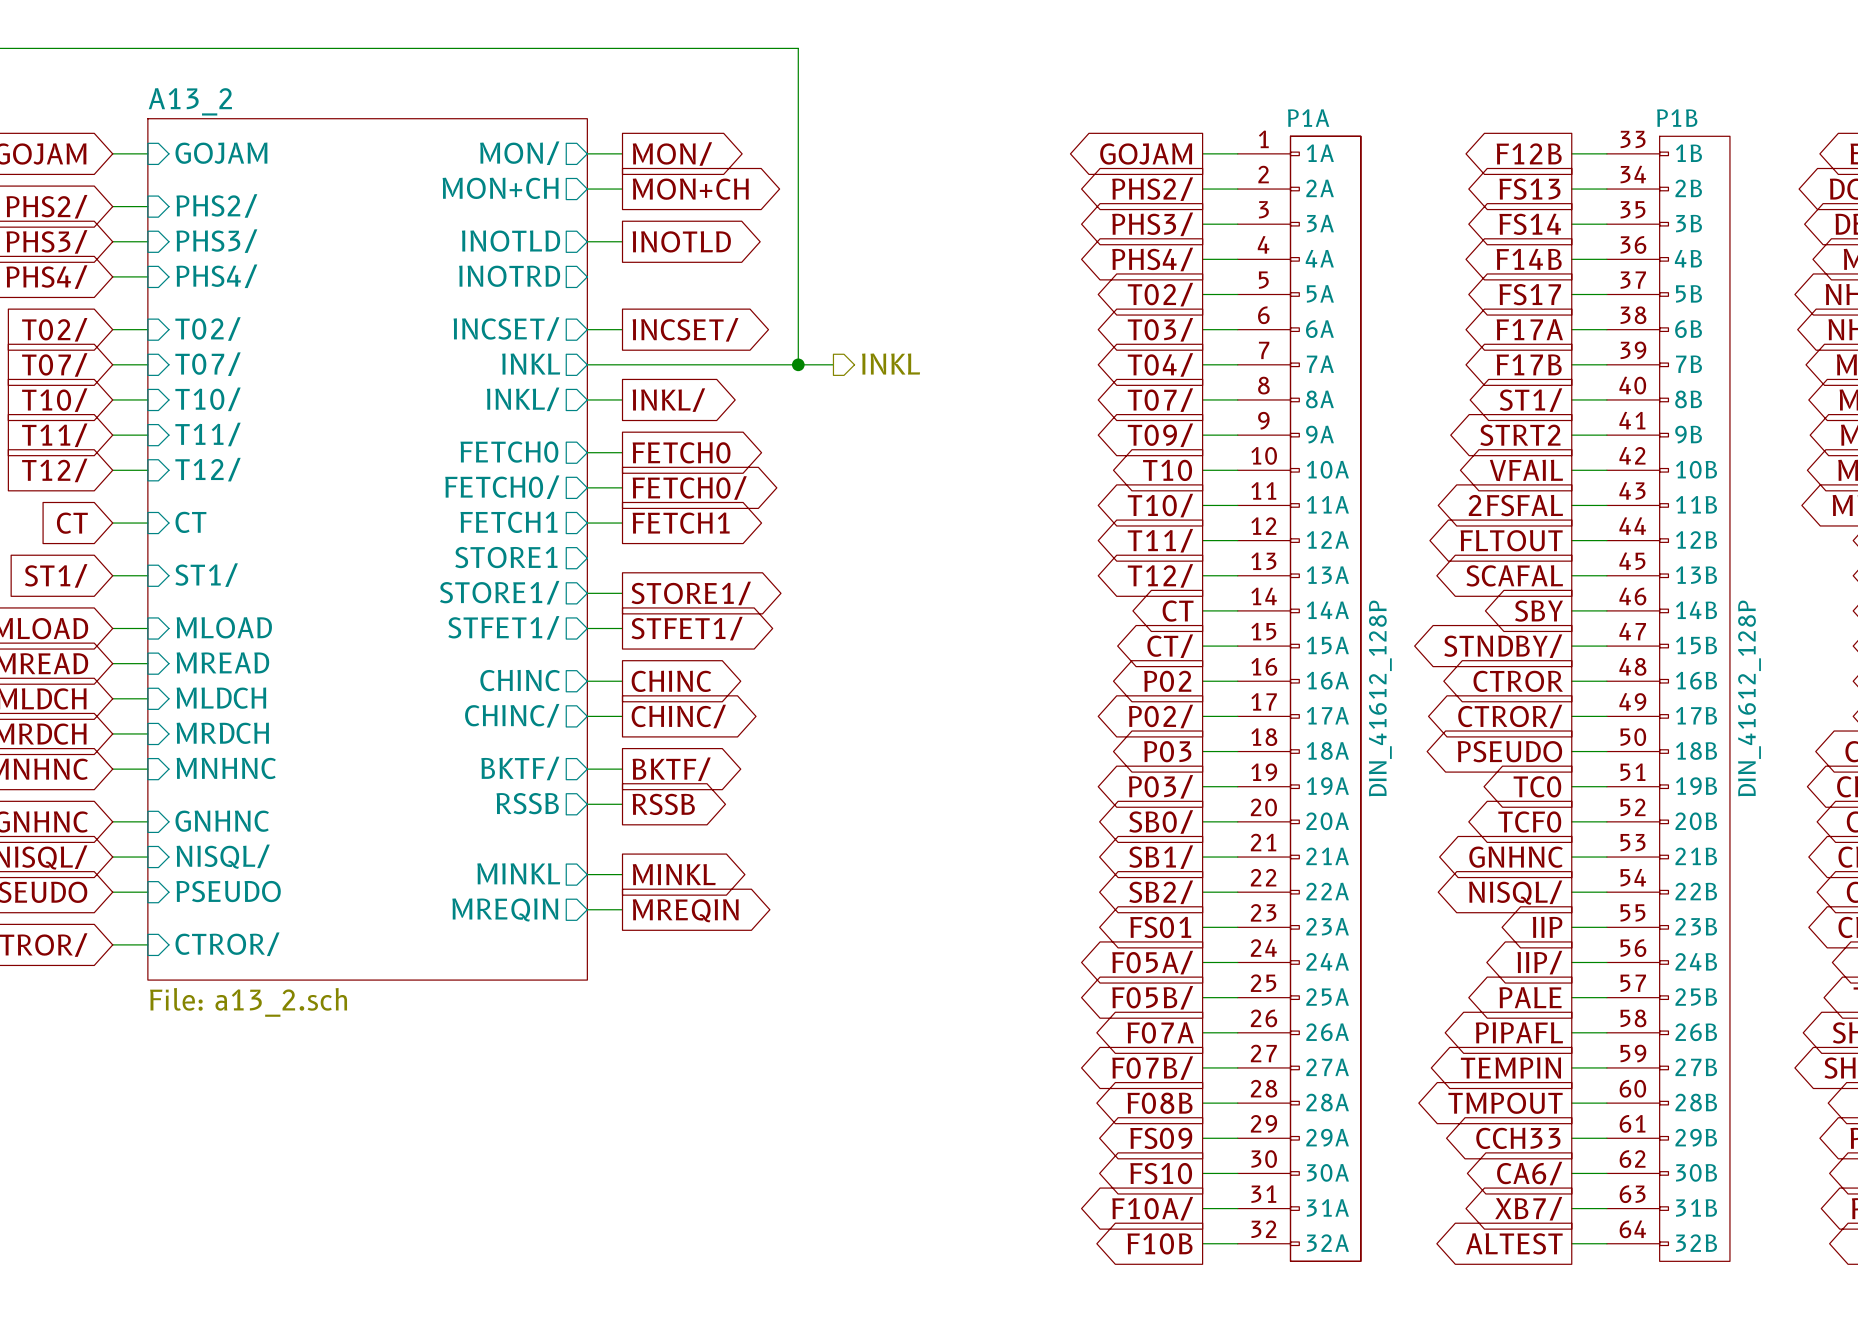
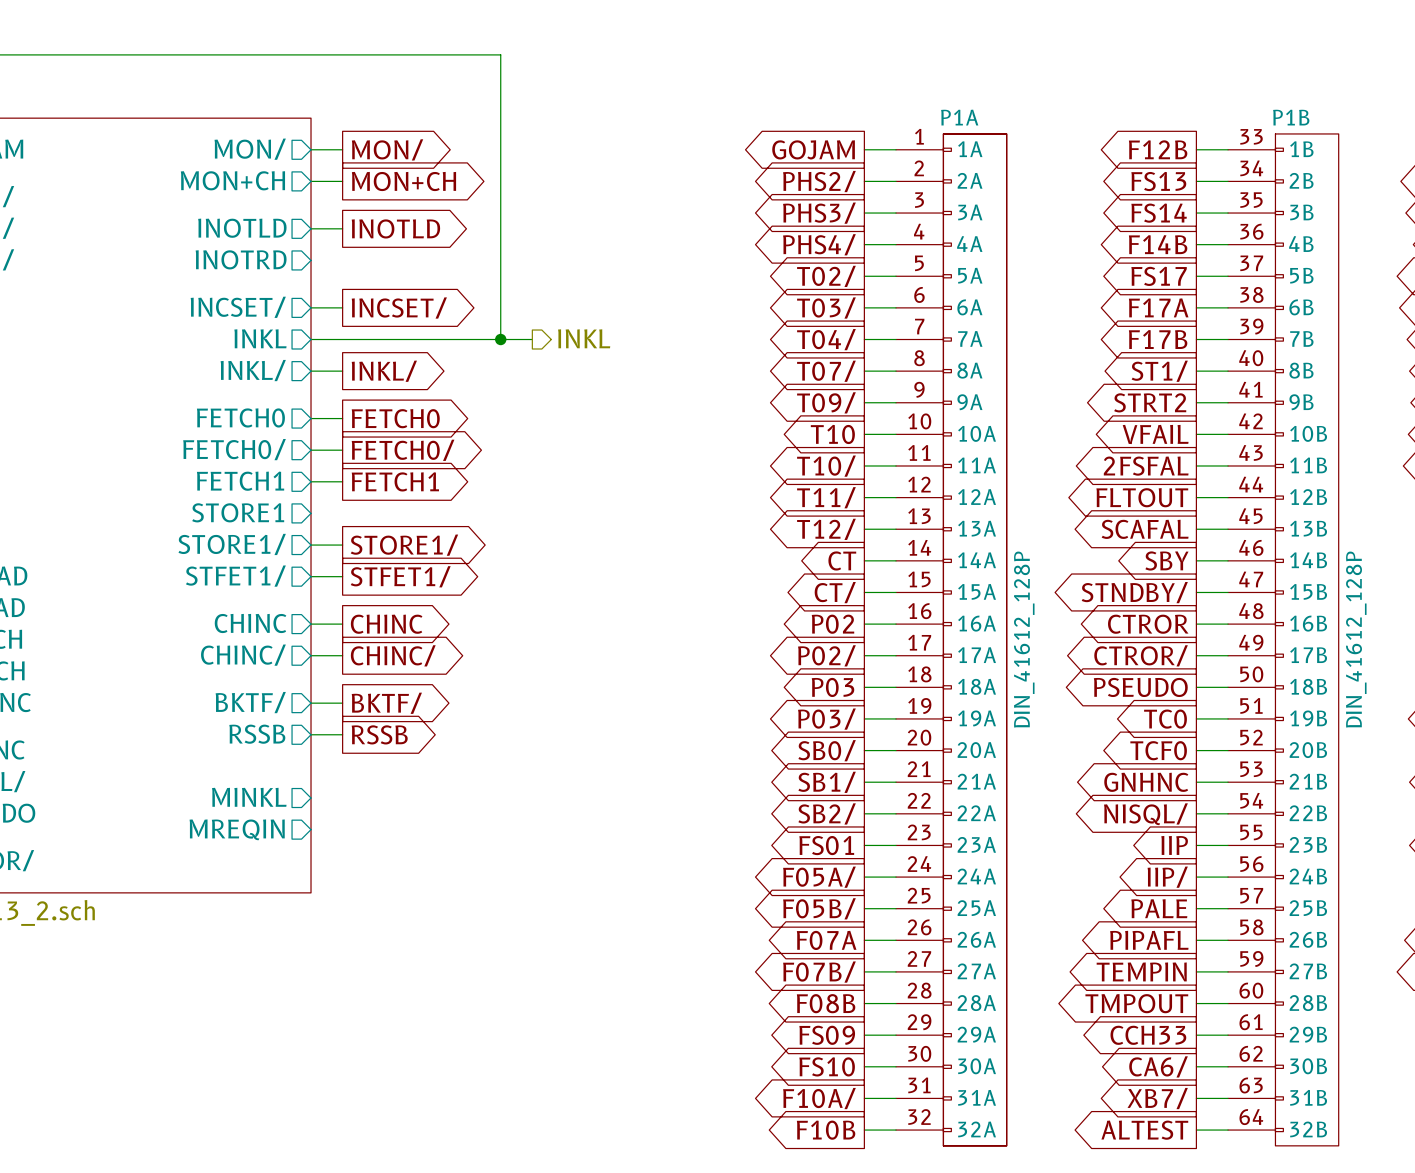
wire: (587, 874) (622, 874) -> none
global label: MINKL (674, 874) -> none
wire: (587, 909) (622, 909) -> none
global label: MREQIN (685, 910) -> none

